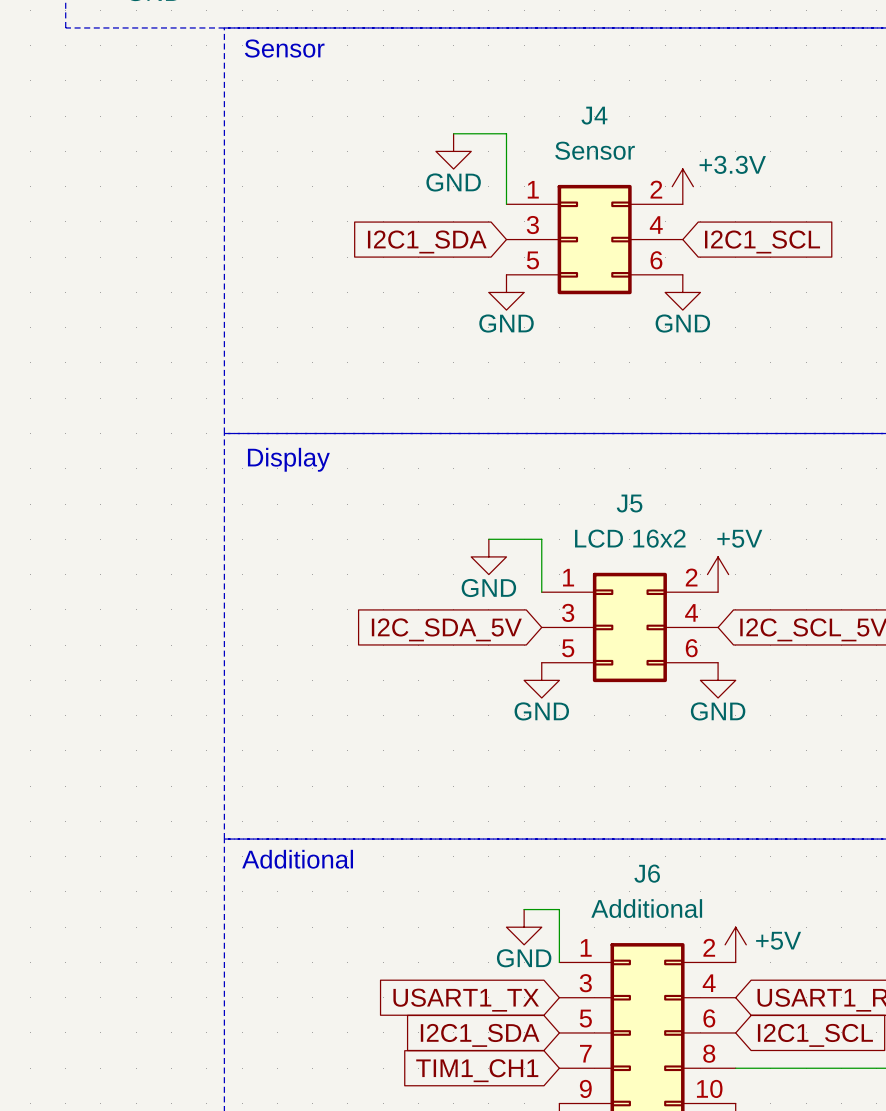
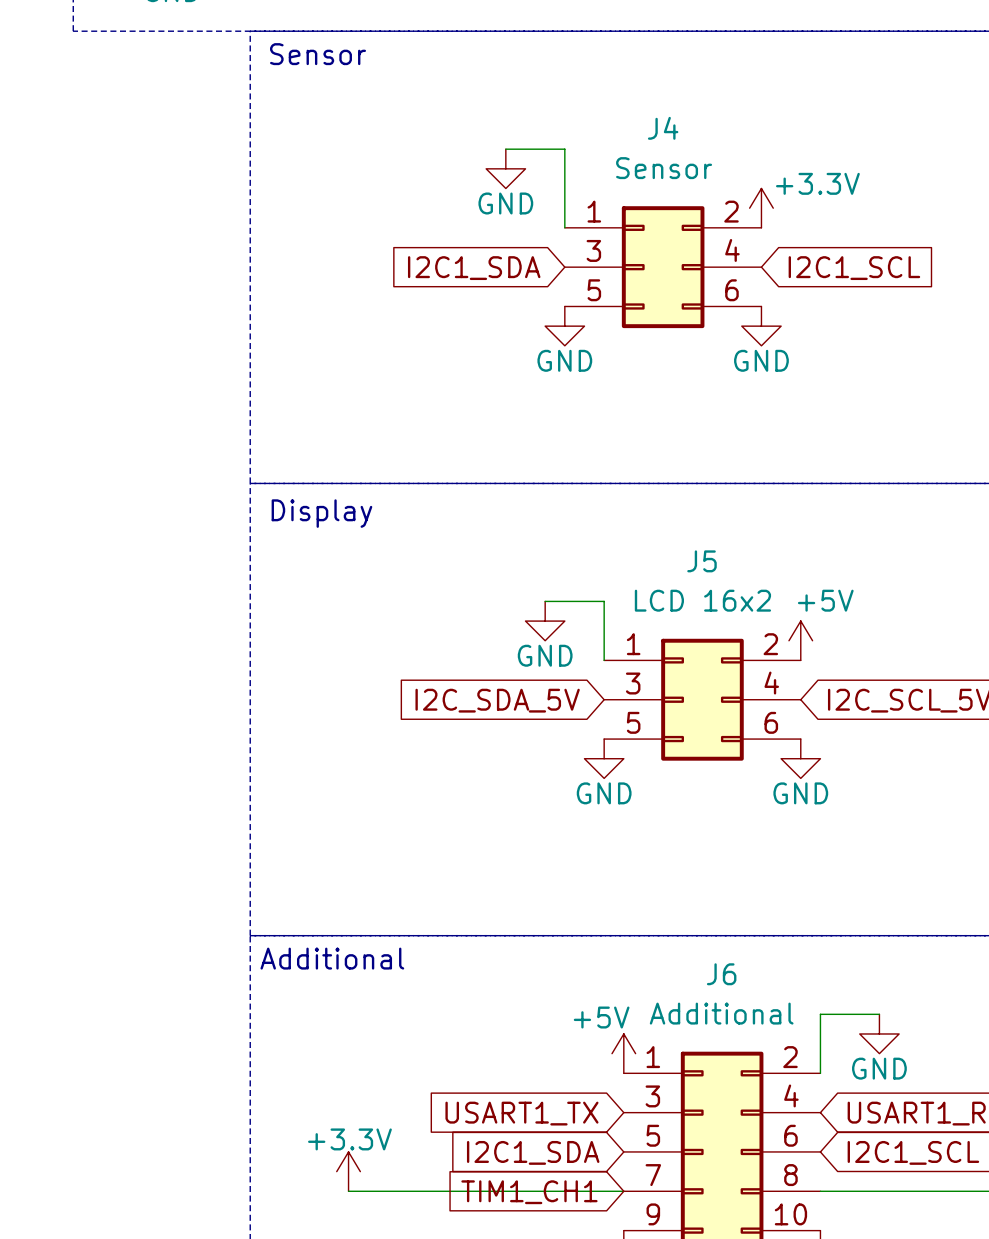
wire: (524, 909) (559, 909) (559, 962) -> none
wire: none -> (879, 1014) (820, 1014) (820, 1073)
power symbol position: GND (524, 927) -> GND (879, 1033)
power symbol text position: +5V (778, 940) -> +5V (601, 1017)
power symbol position: +5V (735, 944) -> +5V (623, 1053)
power symbol: none -> +3.3V (348, 1171)
wire: none -> (348, 1191) (623, 1191)

